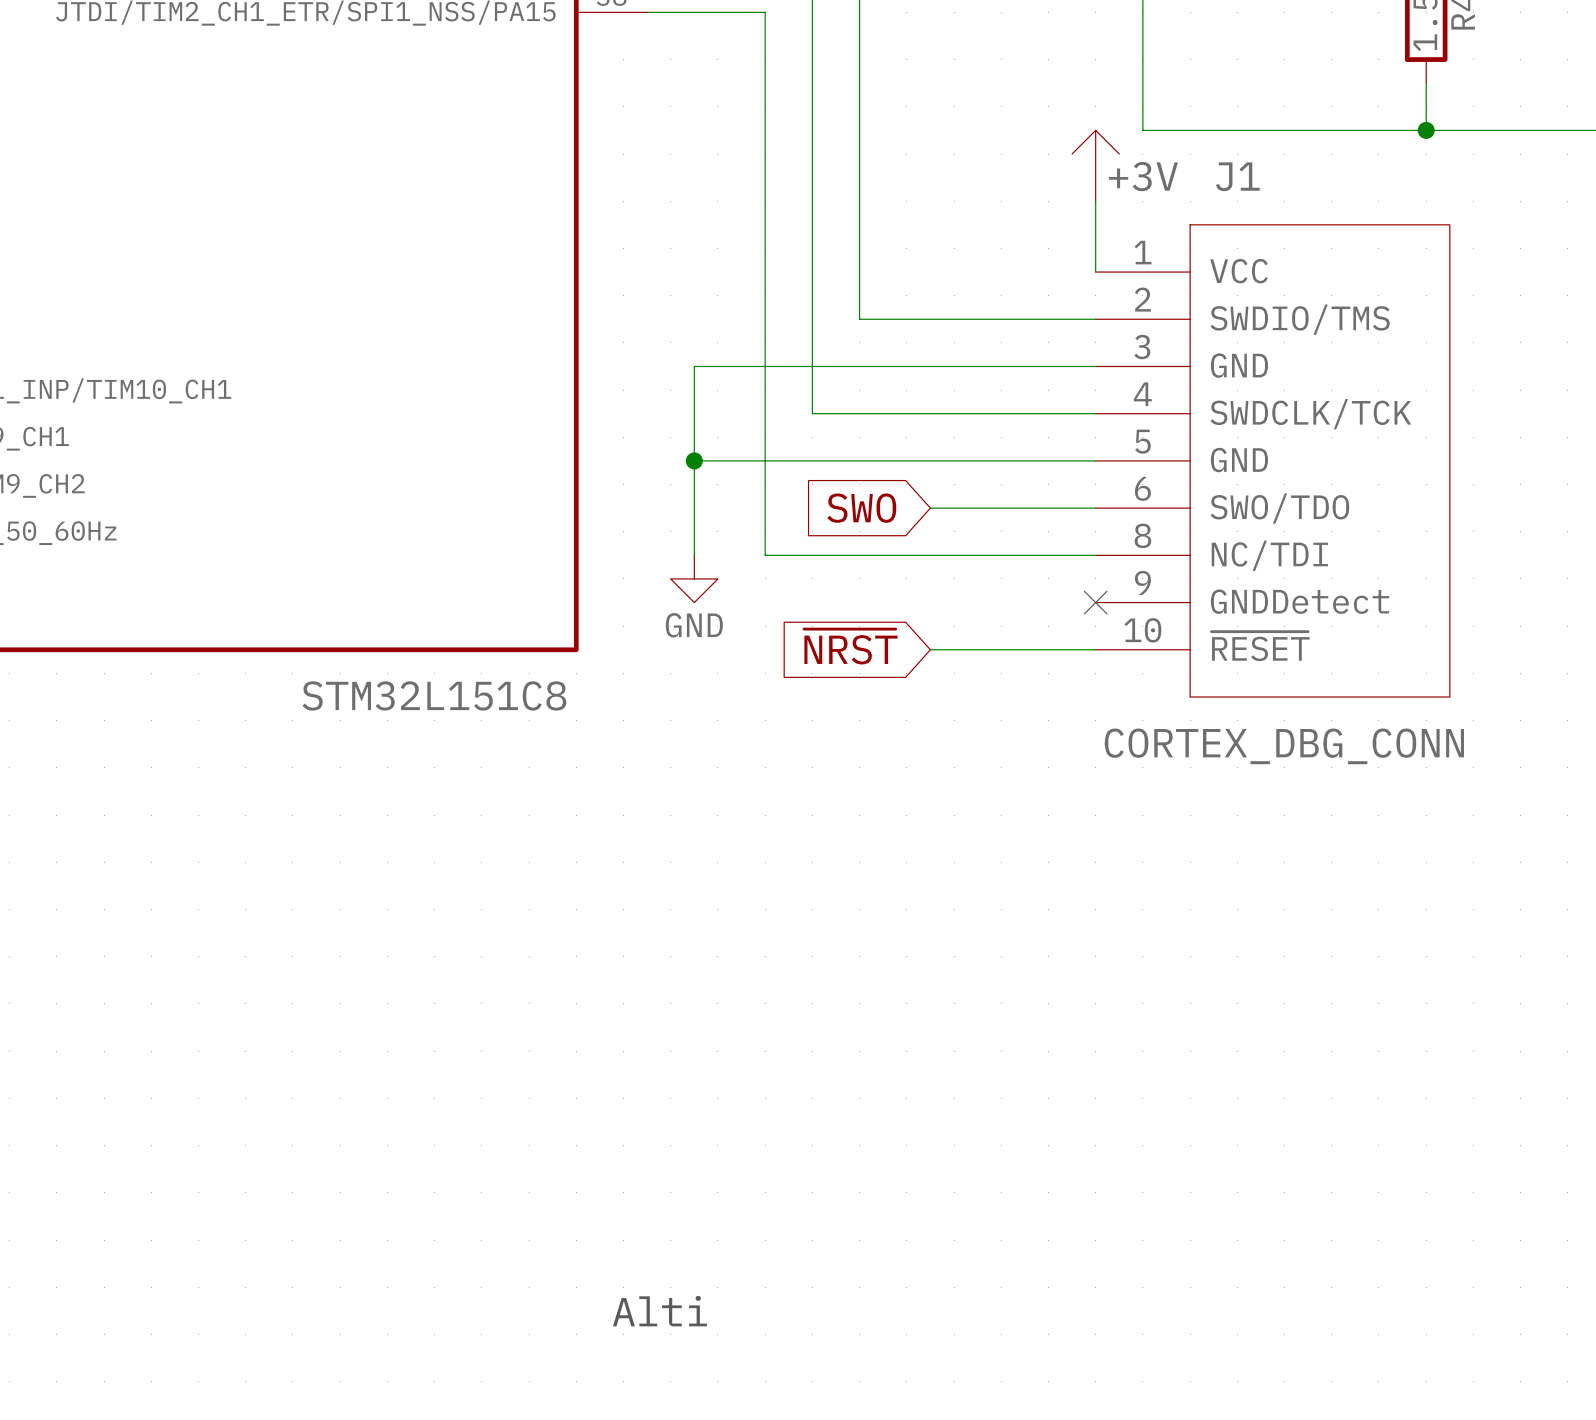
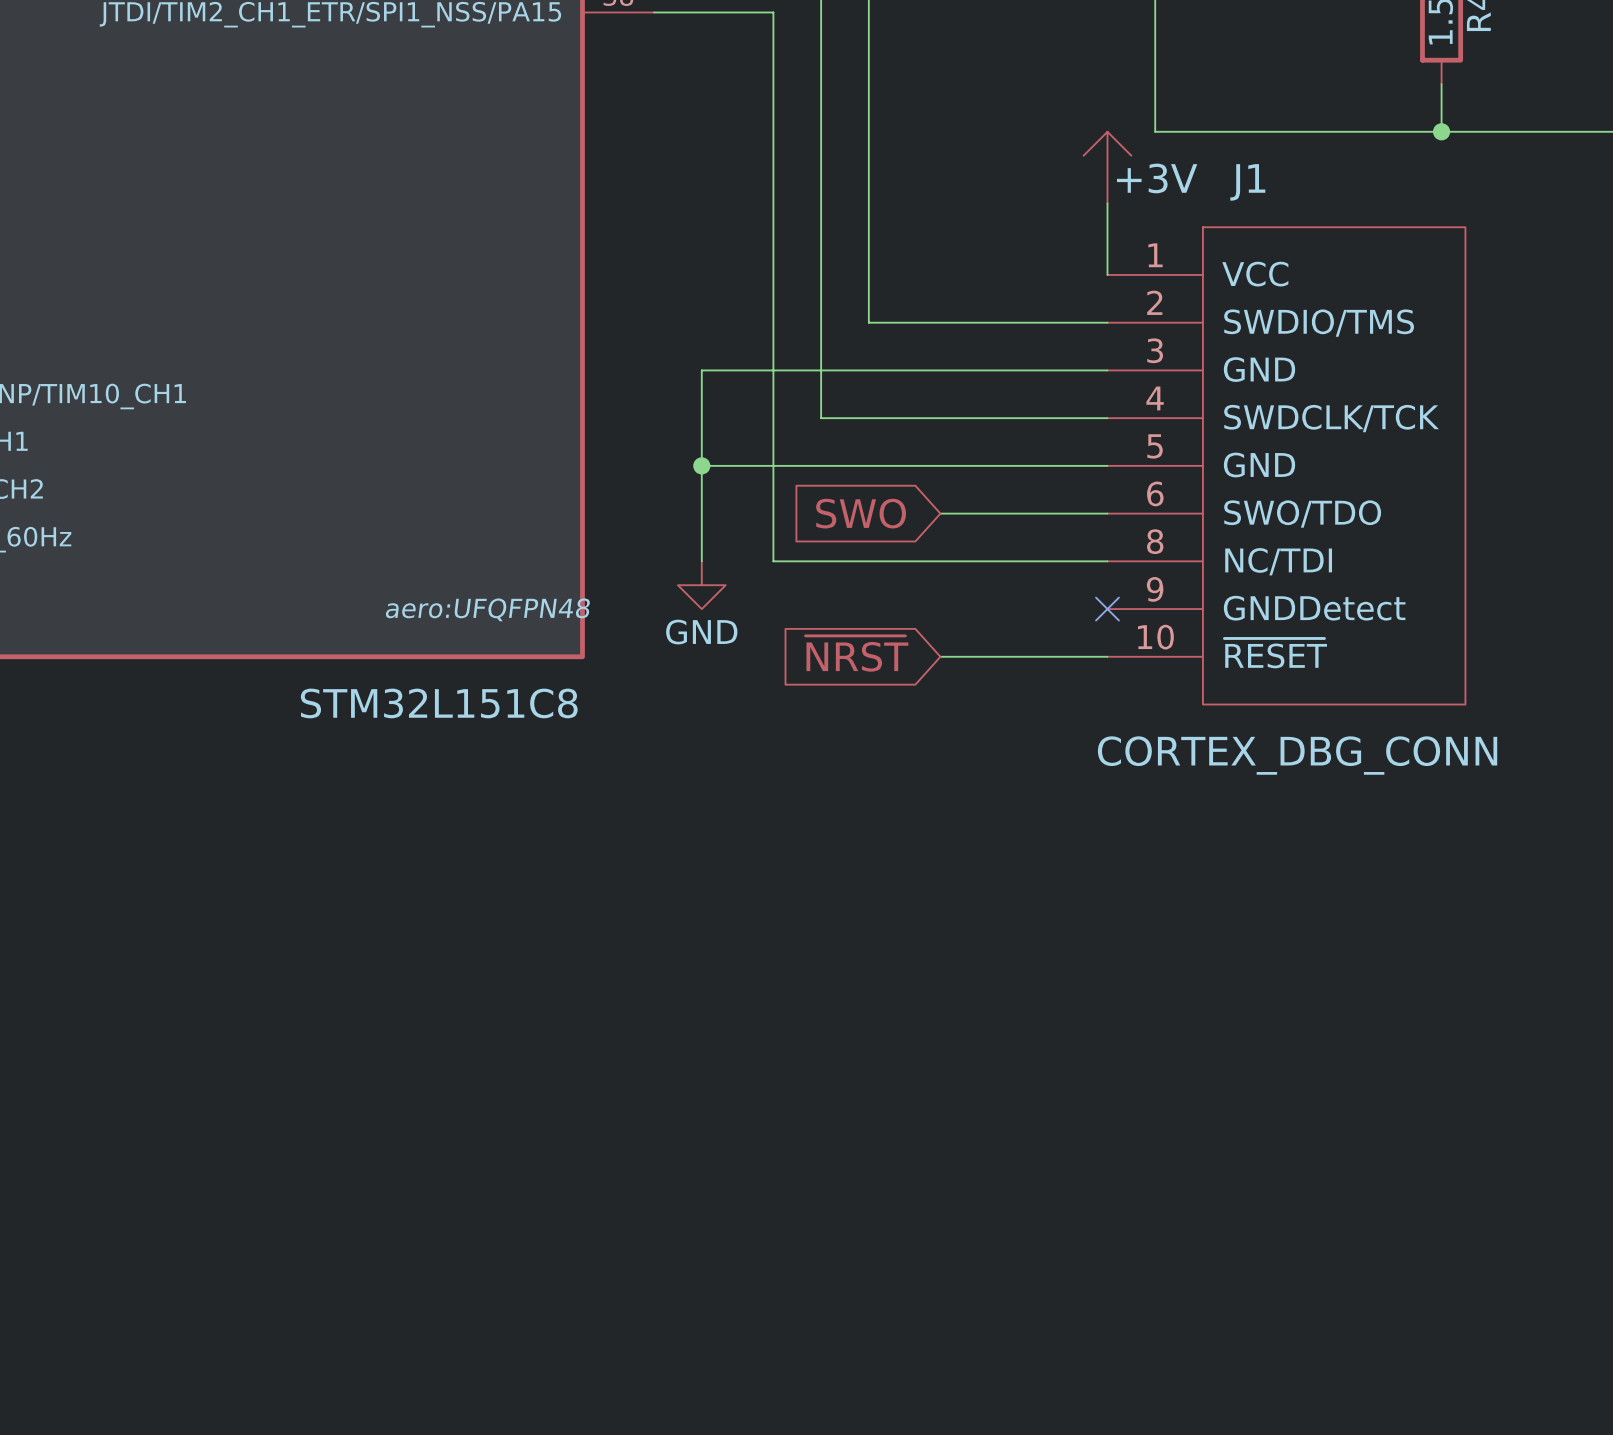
part text: none -> aero:UFQFPN48 (487, 609)
text: Alti (659, 1311) -> none

